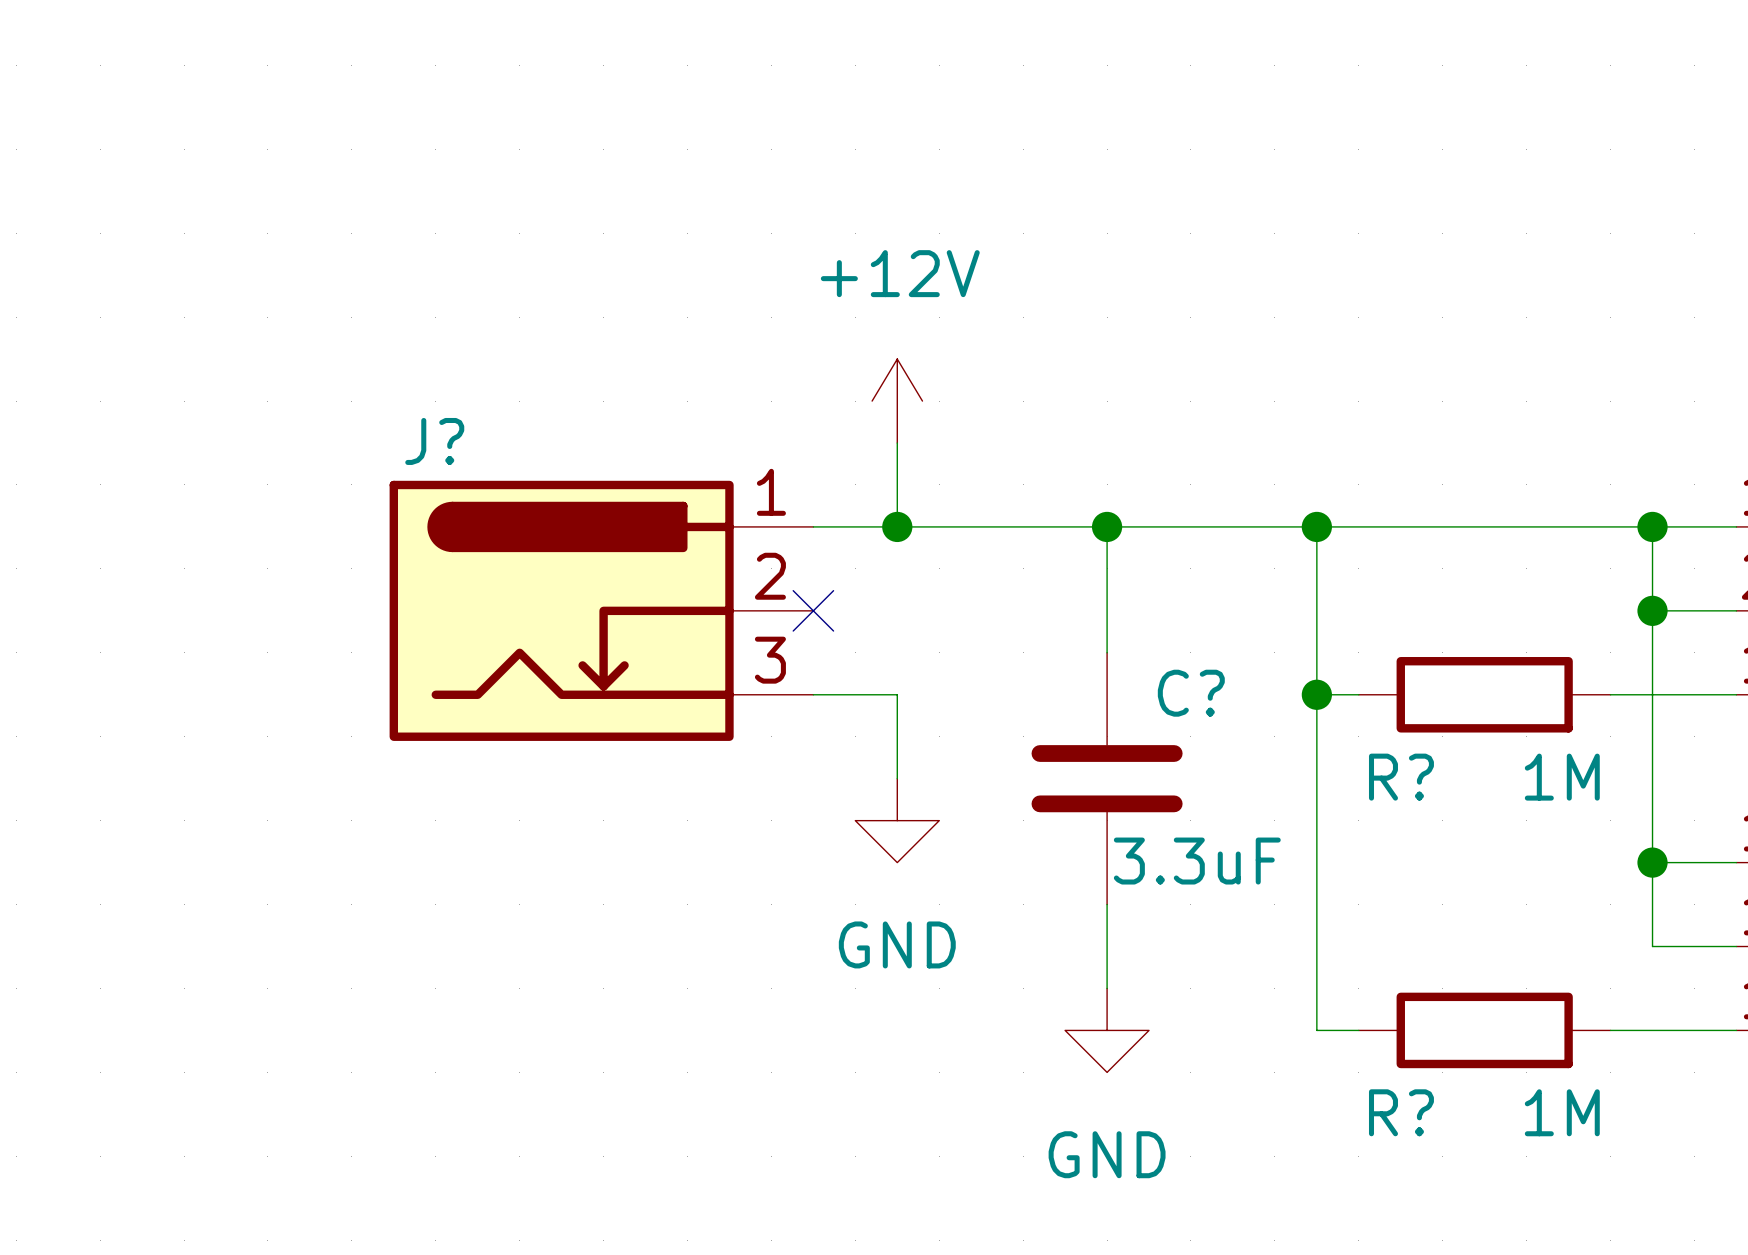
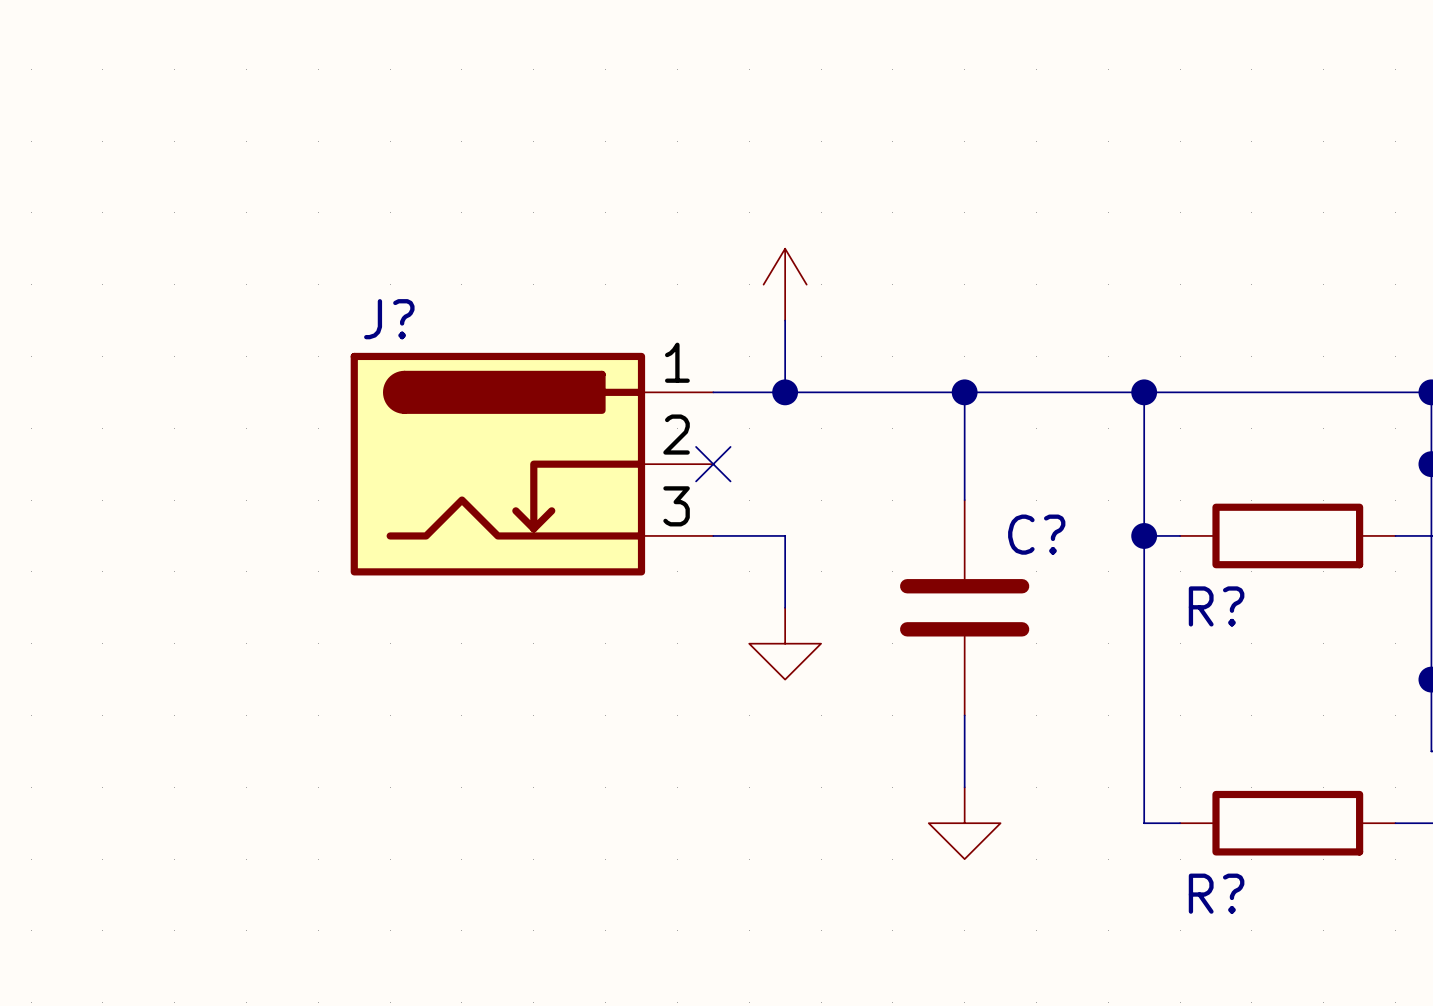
power symbol text: +12V (900, 273) -> none
R? value: 1M (1562, 777) -> none
C? value: 3.3uF (1197, 861) -> none
power symbol text: GND (897, 944) -> none
R? value: 1M (1562, 1112) -> none
power symbol text: GND (1107, 1154) -> none

